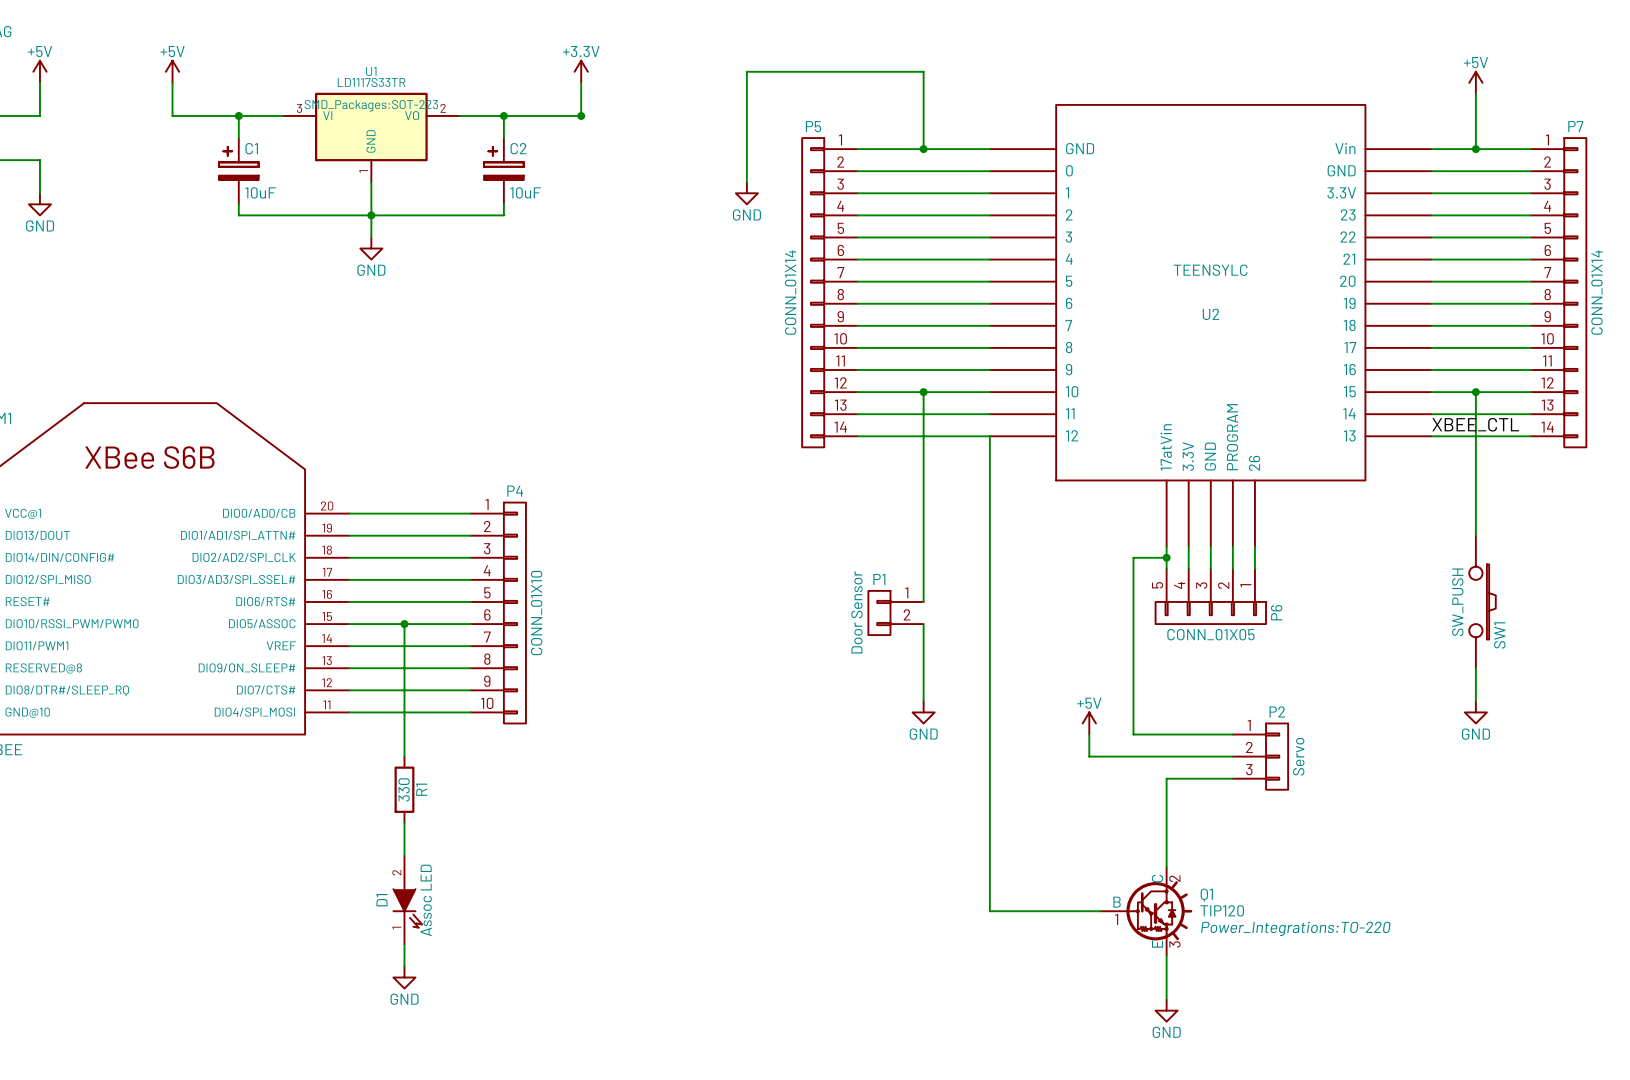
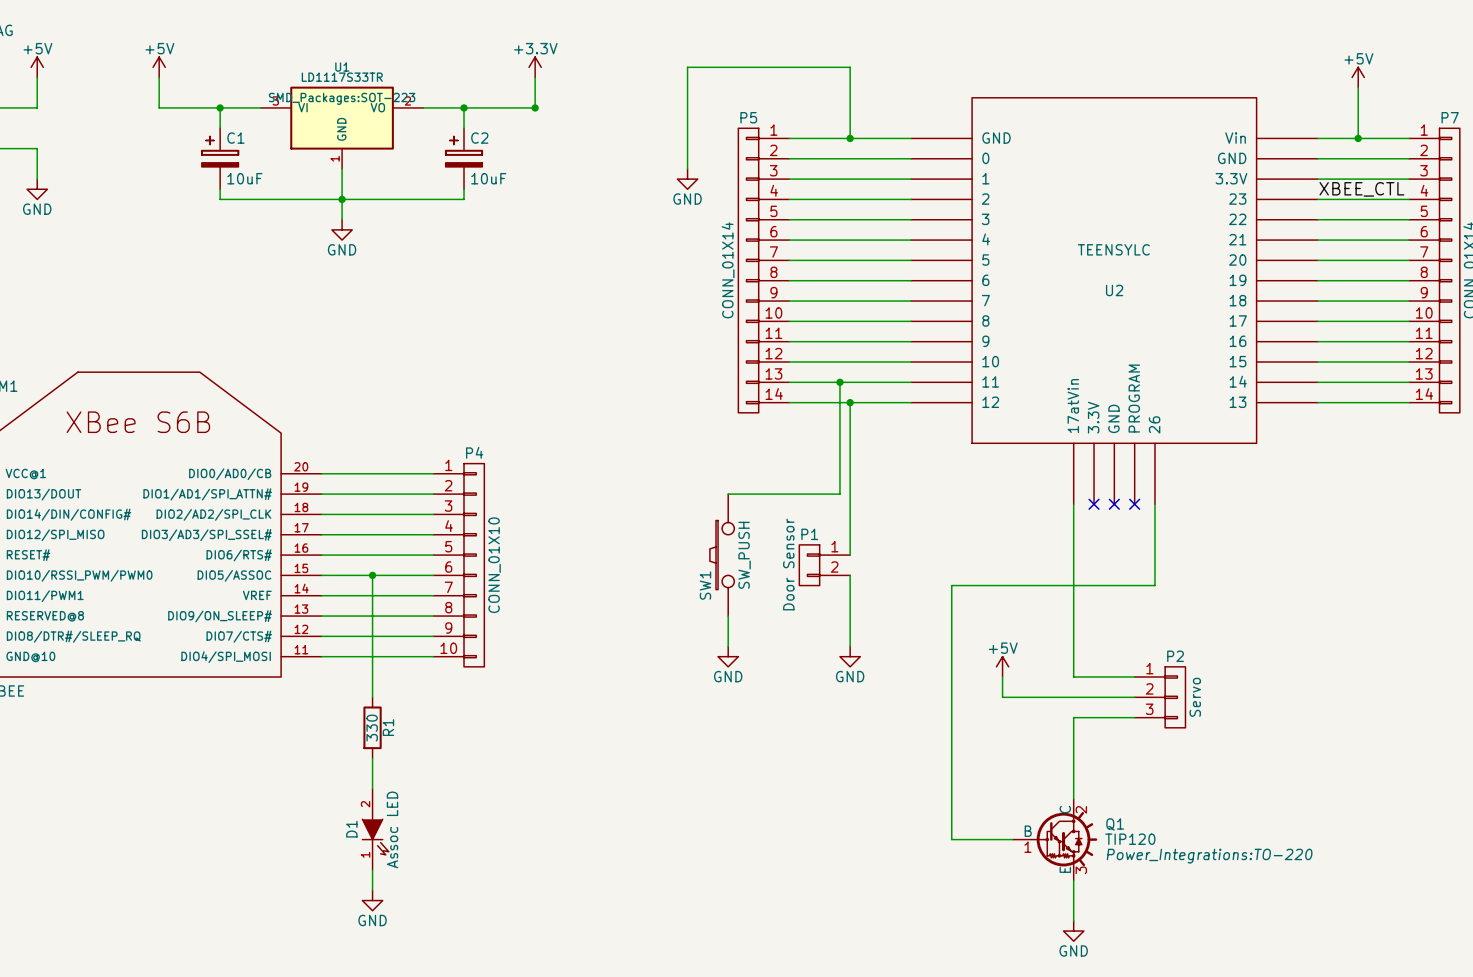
label: none -> XBEE_CTL (1361, 189)
wire: (923, 392) (923, 436) -> none
junction: (923, 392) -> none
wire: (1475, 392) (1475, 535) -> none
junction: (1475, 392) -> none
wire: none -> (839, 382) (839, 494) (728, 494)
junction: none -> (839, 382)
label: XBEE_CTL (1475, 424) -> none
junction: none -> (850, 402)
wire: (989, 436) (989, 911) (1034, 911) -> (1154, 524) (1154, 585) (951, 585) (951, 839)
wire: (1188, 546) (1188, 568) -> none
no-connect mark: none -> (1094, 504)
wire: (1210, 546) (1210, 568) -> none
no-connect mark: none -> (1114, 504)
wire: (1232, 546) (1232, 568) -> none
no-connect mark: none -> (1134, 504)
wire: (1166, 557) (1133, 557) (1133, 734) (1166, 734) -> (1073, 524) (1073, 677)
junction: (1166, 557) -> none
P6: CONN_01X05 (1210, 596) -> none
SW1 position: (1482, 601) -> (722, 555)
SW1 rotation: 0° (1491, 601) -> 180° (713, 555)
SW1 name position: SW1 (1499, 635) -> SW1 (705, 585)
wire: none -> (728, 616) (728, 646)
wire: (1475, 668) (1475, 701) -> none
power symbol: none -> GND (728, 656)
power symbol: GND (1475, 712) -> none

